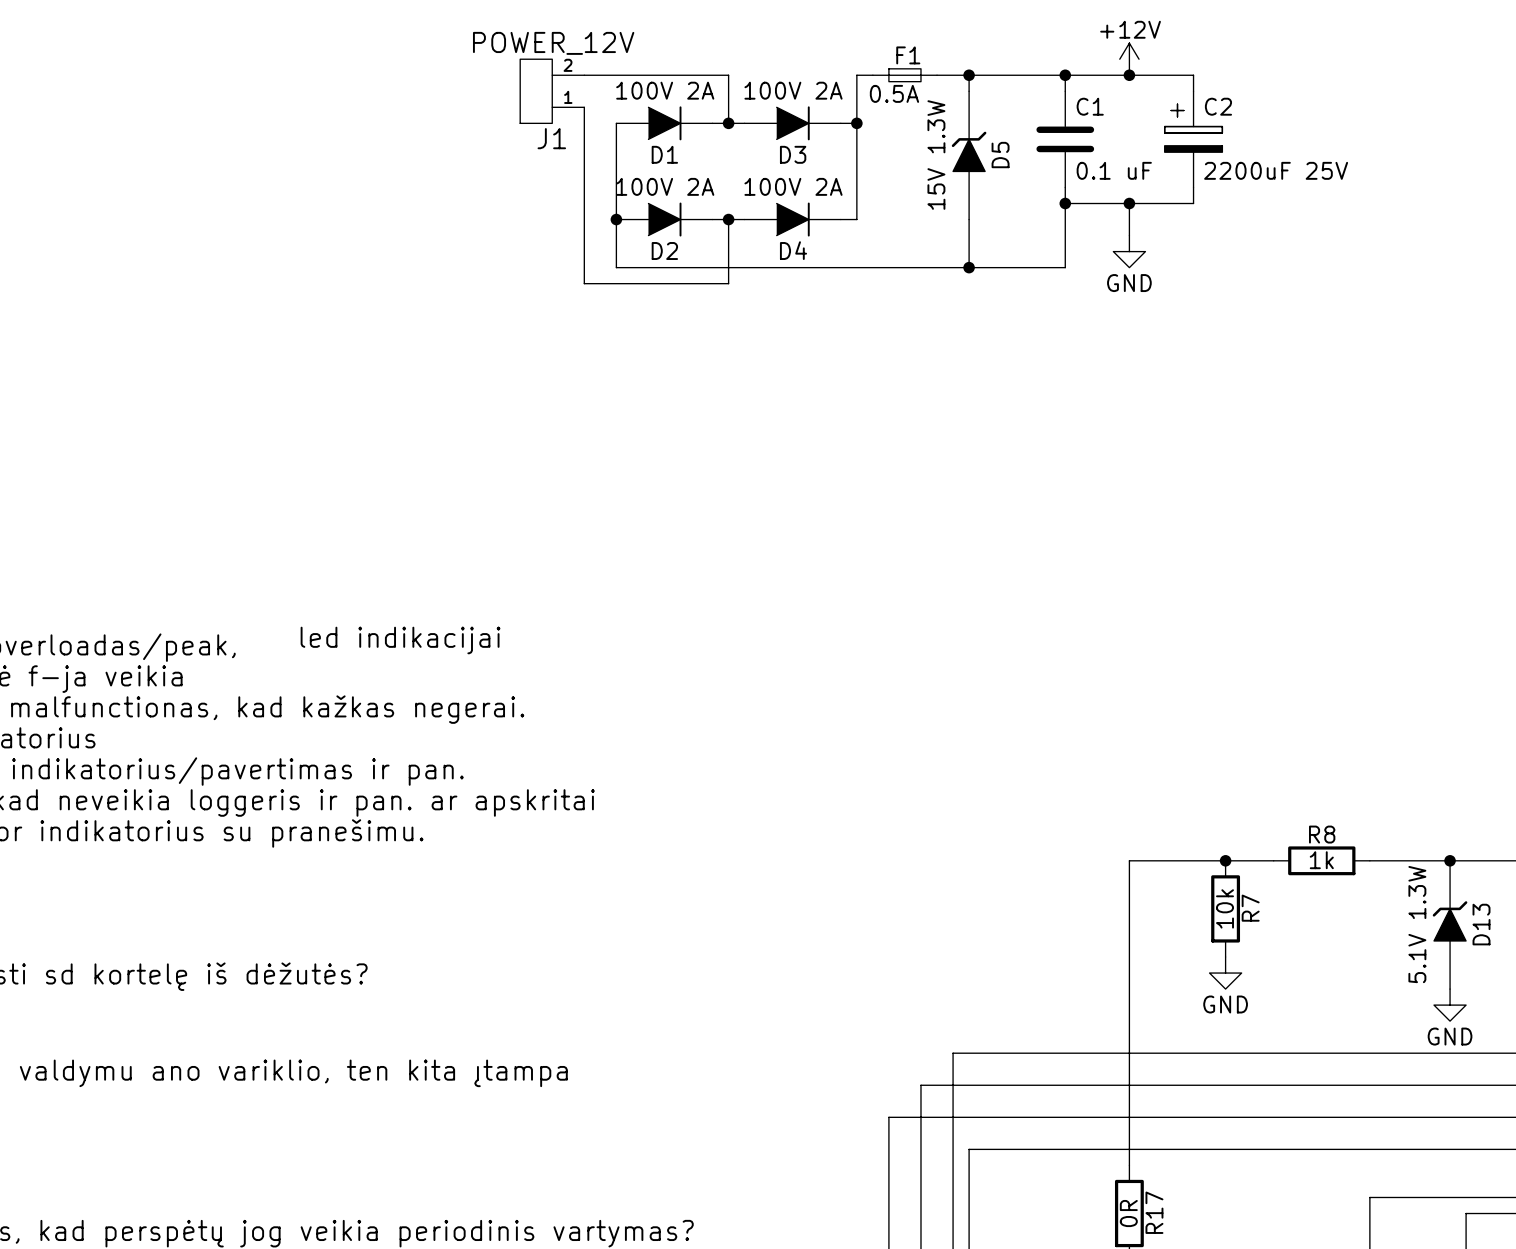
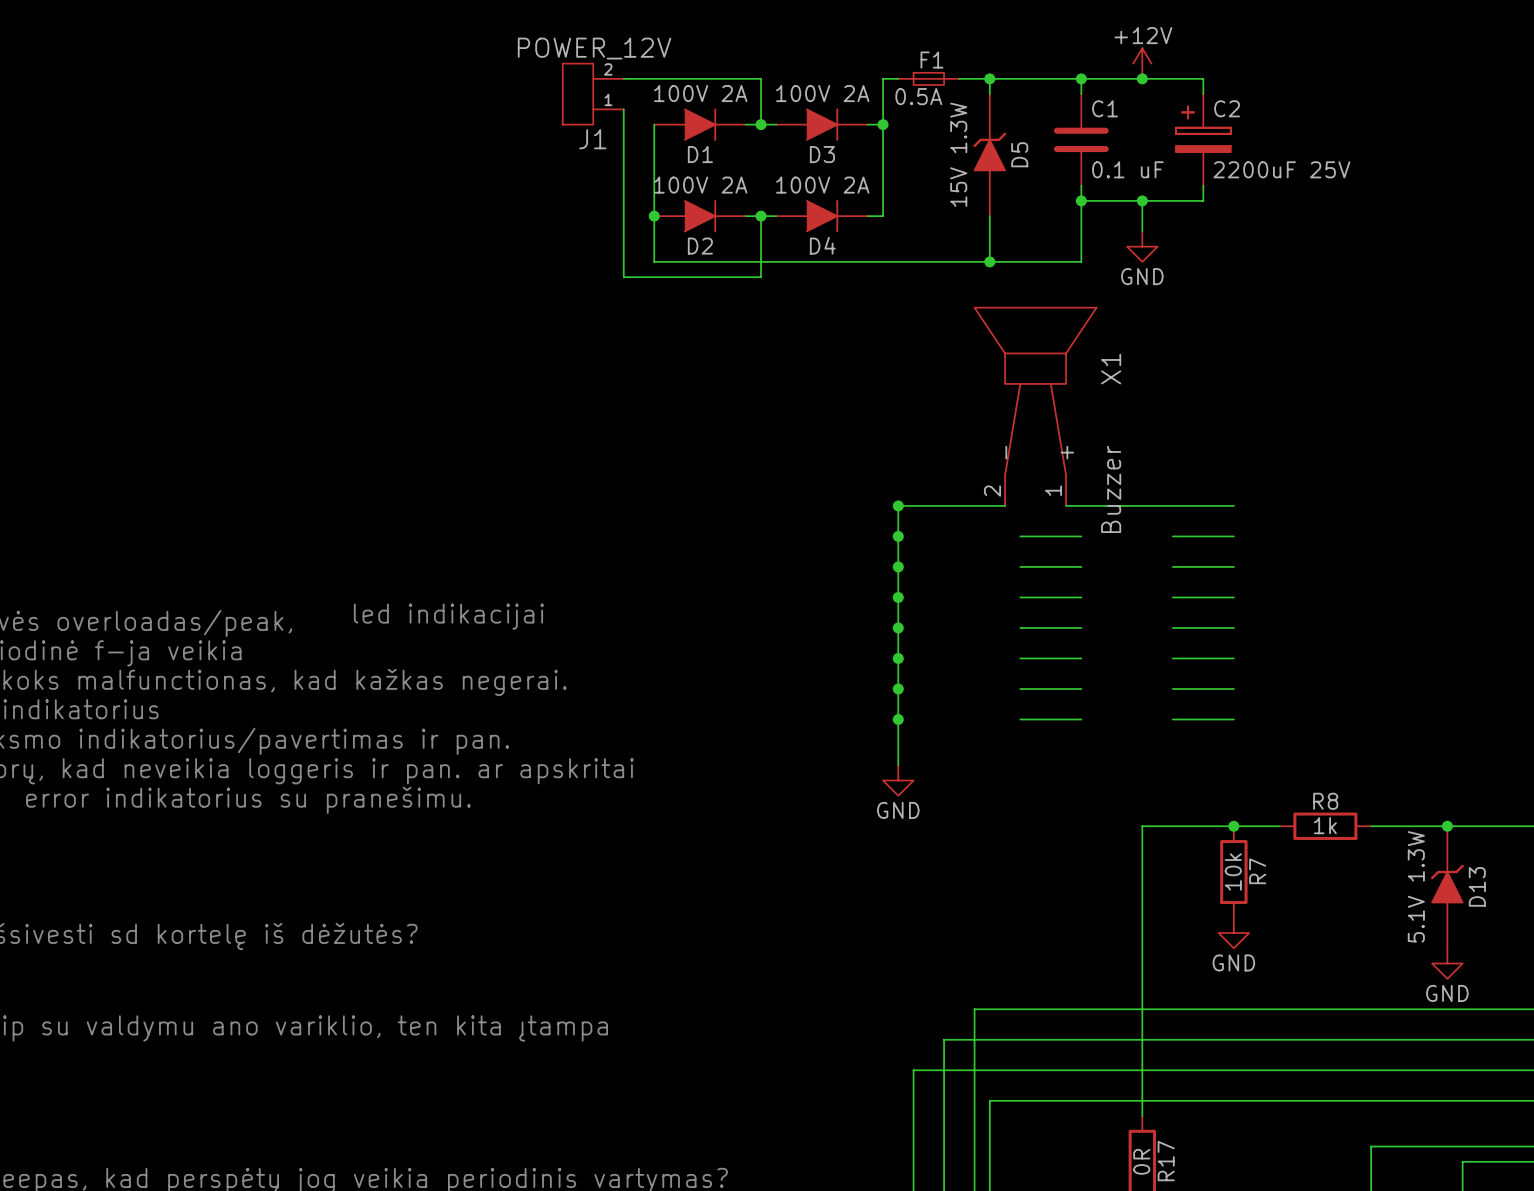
X1: none -> Buzzer (1035, 406)
junction: none -> (898, 505)
wire: none -> (1005, 505) (898, 505) (898, 765)
wire: none -> (1066, 505) (1233, 505)
junction: none -> (898, 536)
wire: none -> (1020, 536) (1081, 536)
wire: none -> (1172, 536) (1233, 536)
junction: none -> (898, 566)
wire: none -> (1020, 566) (1081, 566)
wire: none -> (1172, 566) (1233, 566)
junction: none -> (898, 597)
wire: none -> (1020, 597) (1081, 597)
wire: none -> (1172, 597) (1233, 597)
junction: none -> (898, 627)
wire: none -> (1020, 627) (1081, 627)
wire: none -> (1172, 627) (1233, 627)
junction: none -> (898, 658)
wire: none -> (1020, 658) (1081, 658)
wire: none -> (1172, 658) (1233, 658)
junction: none -> (898, 688)
wire: none -> (1020, 688) (1081, 688)
wire: none -> (1172, 688) (1233, 688)
junction: none -> (898, 719)
wire: none -> (1020, 719) (1081, 719)
wire: none -> (1172, 719) (1233, 719)
power symbol: none -> GND (898, 780)

